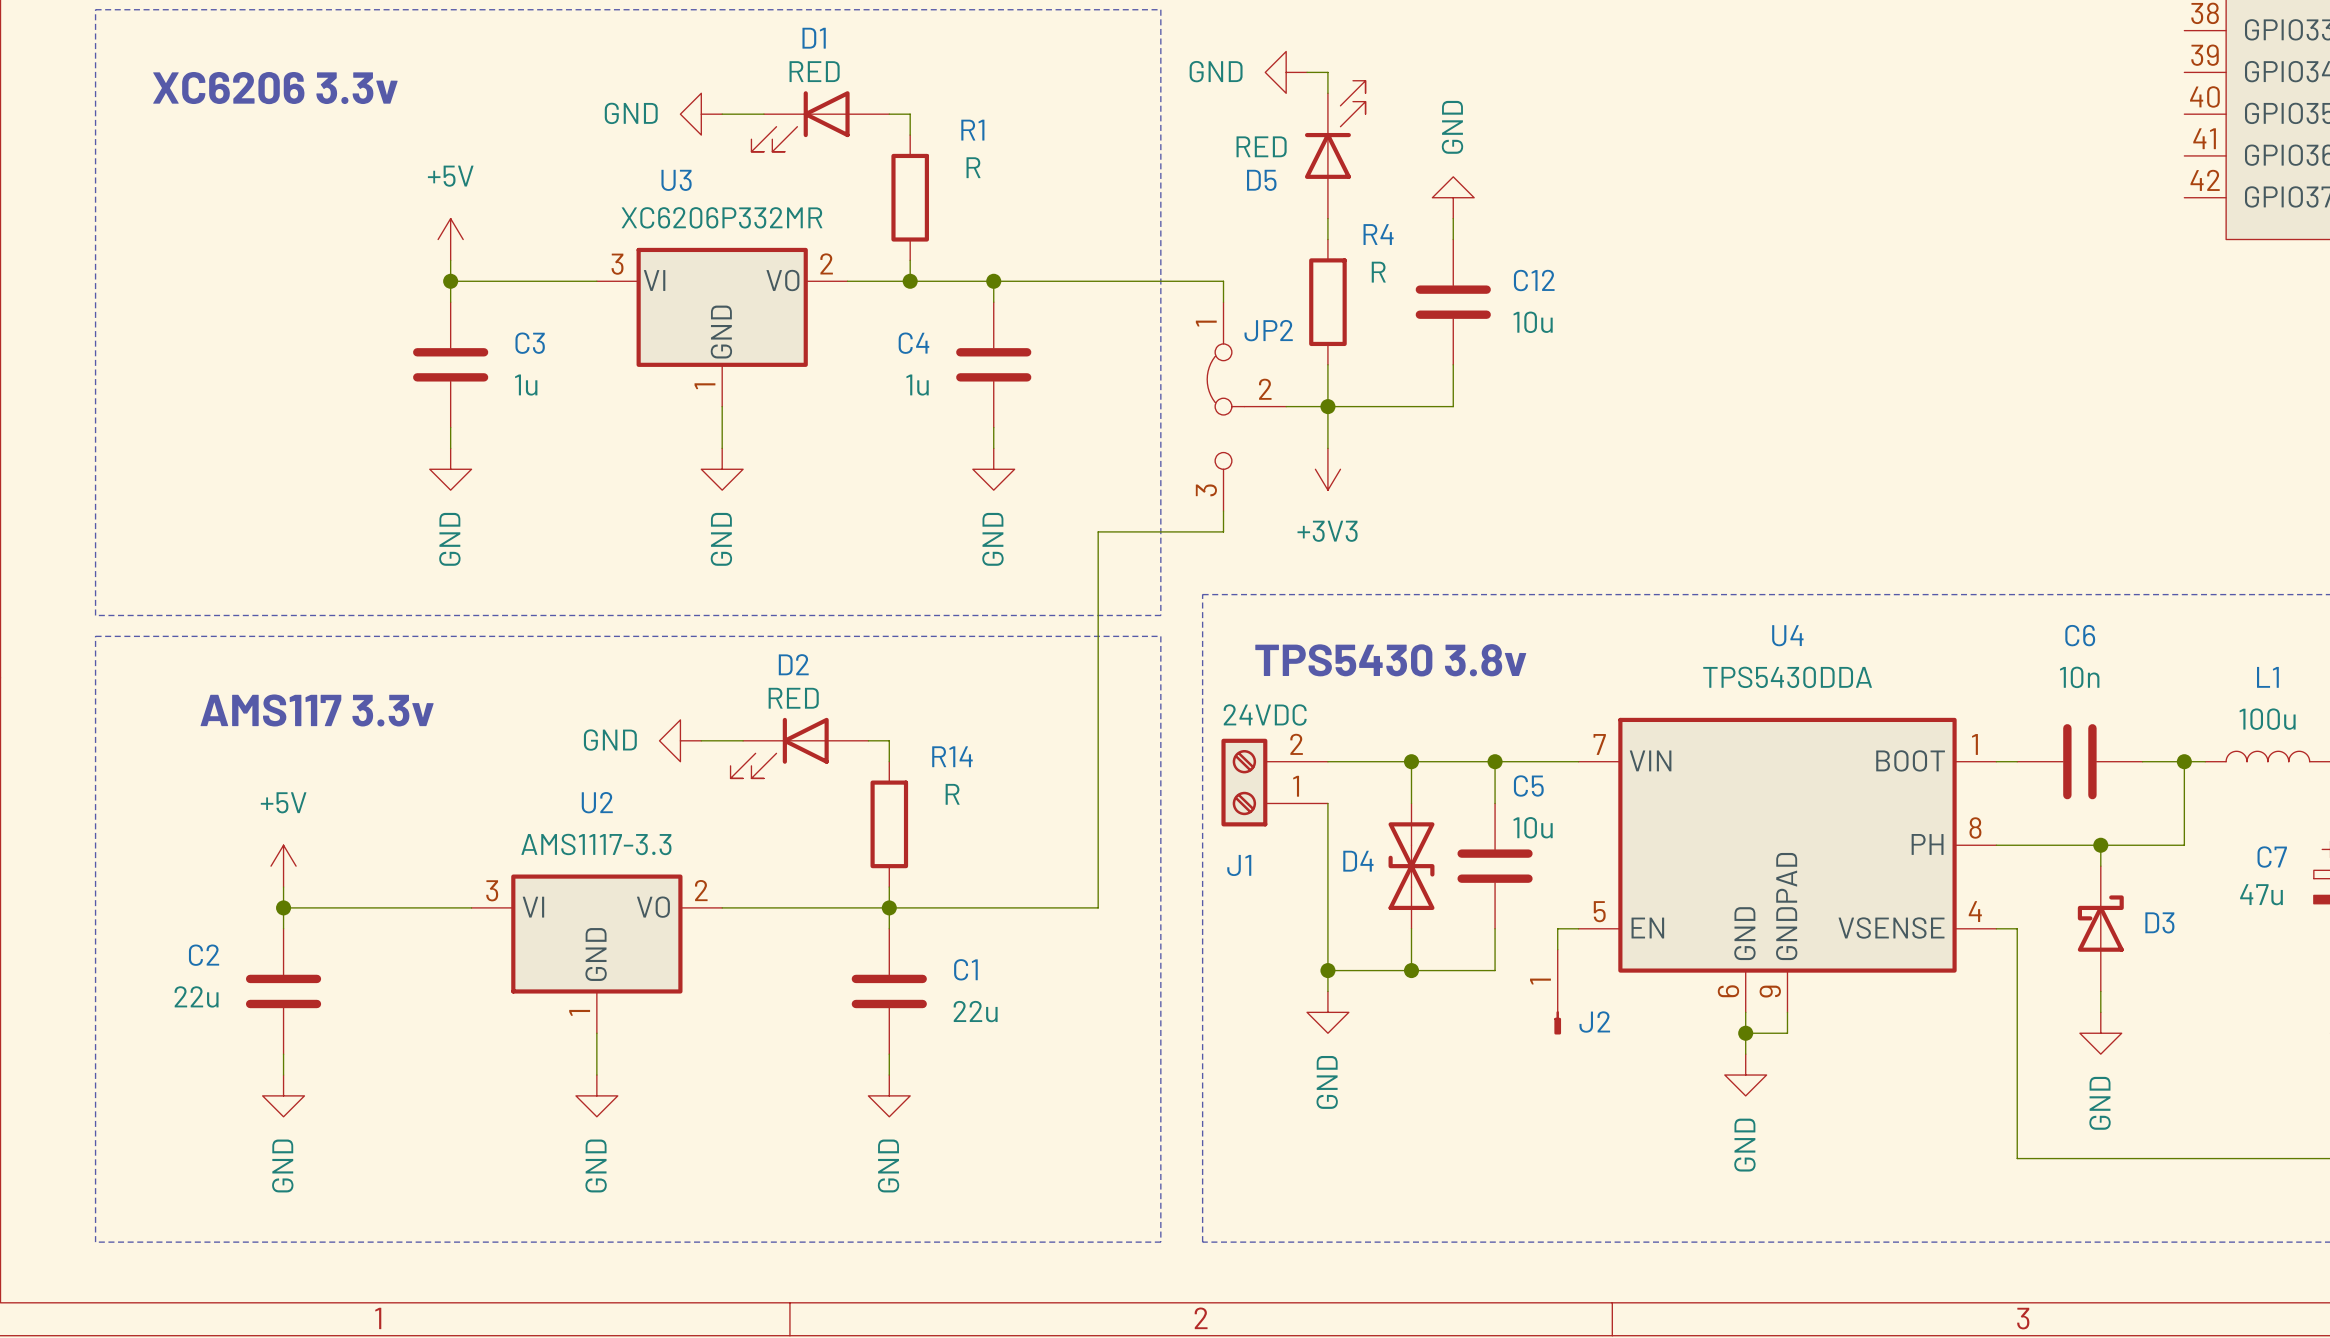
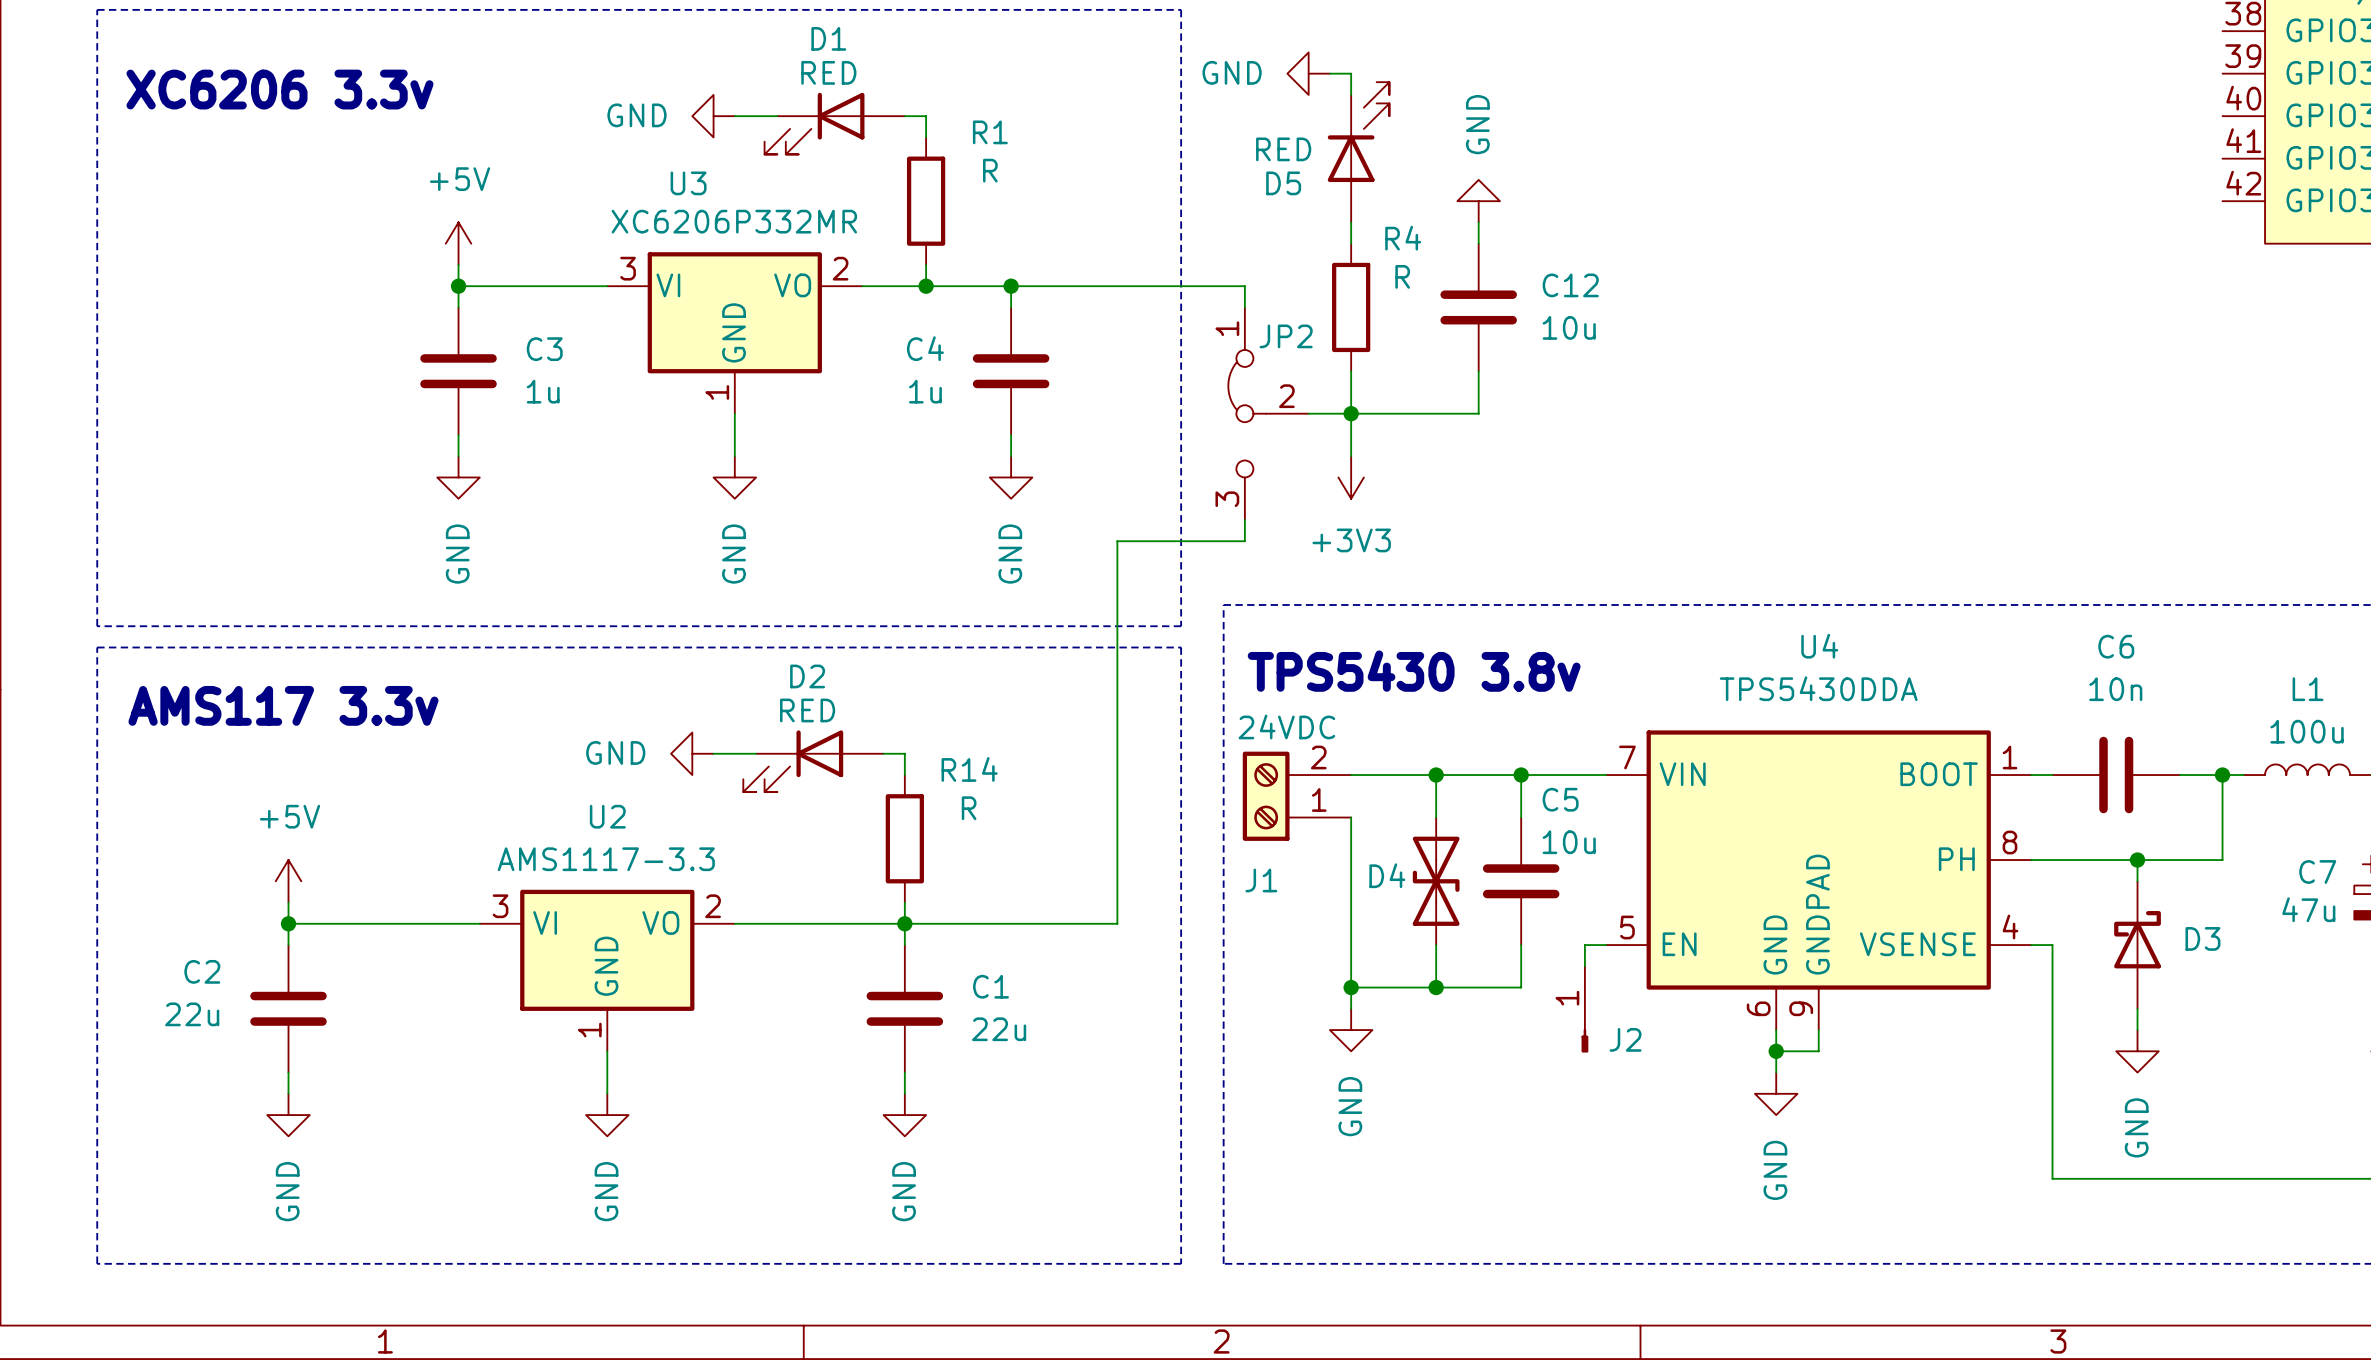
text position: AMS117 3.3v (317, 710) -> AMS117 3.3v (283, 705)

